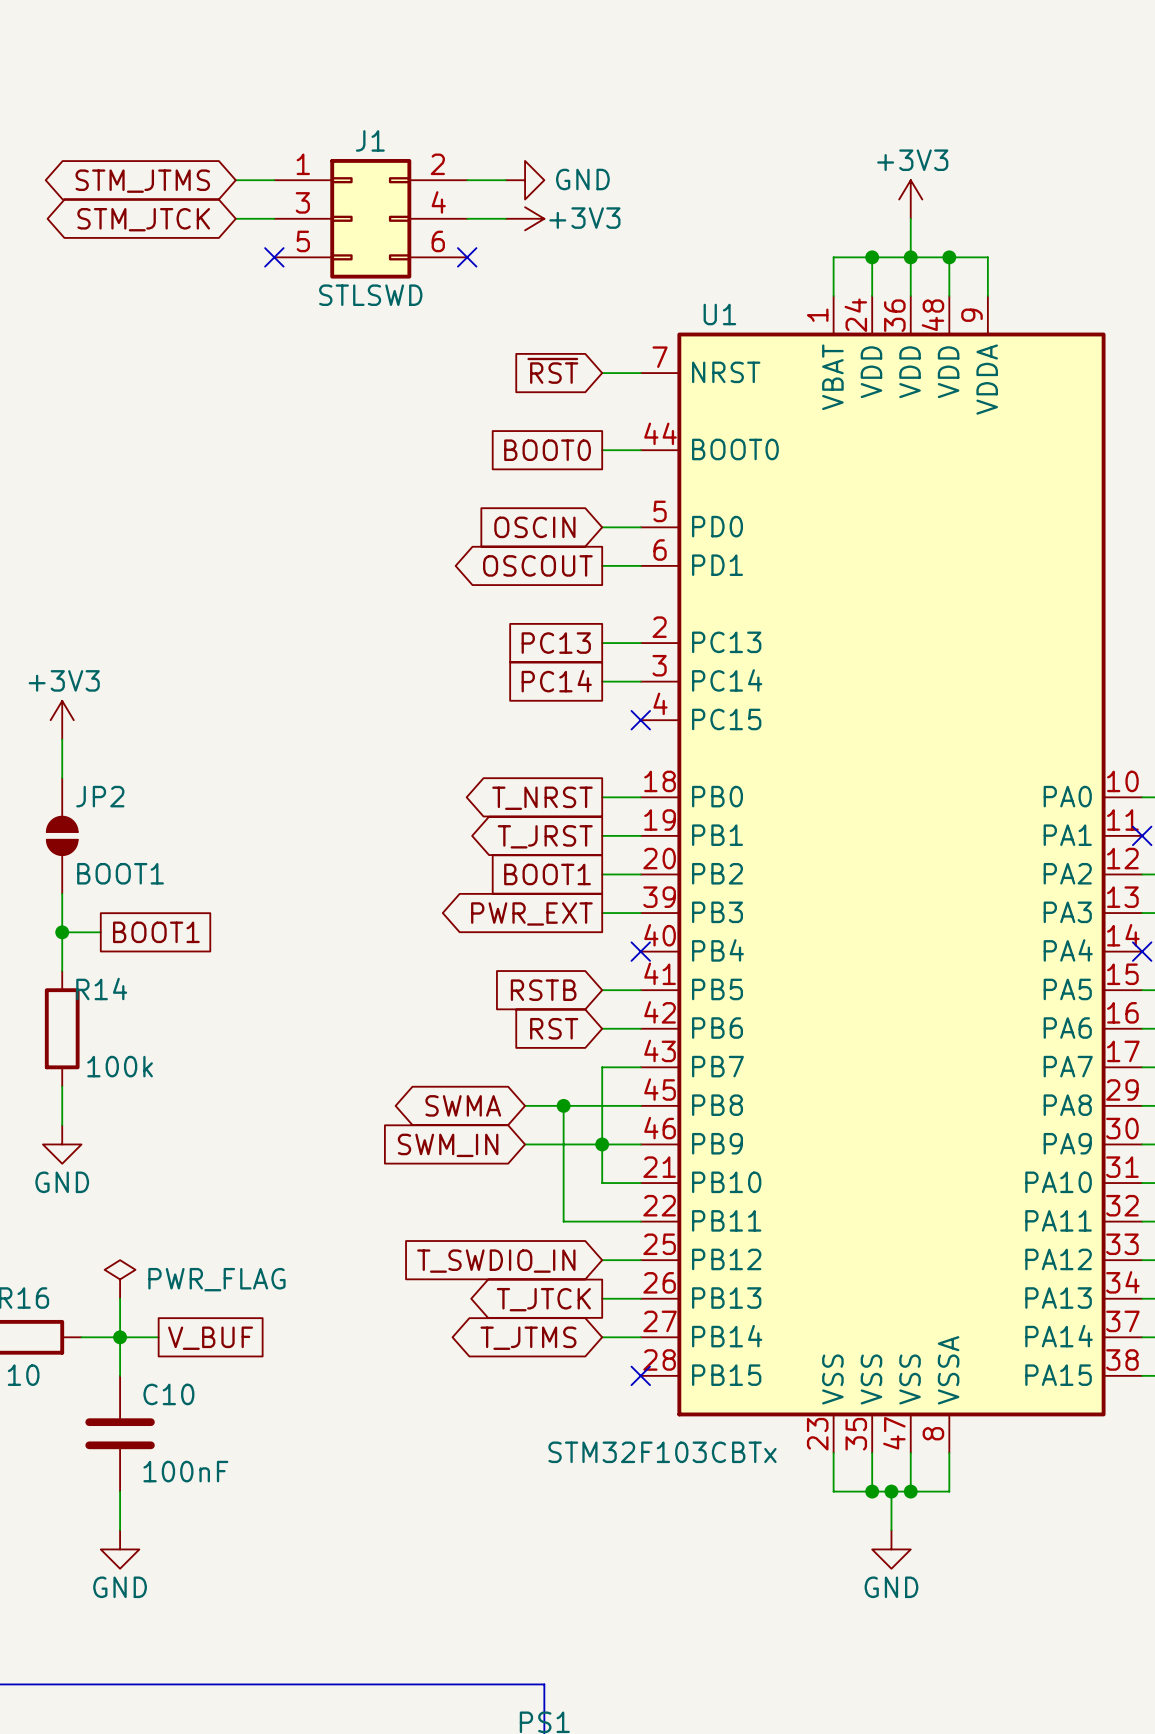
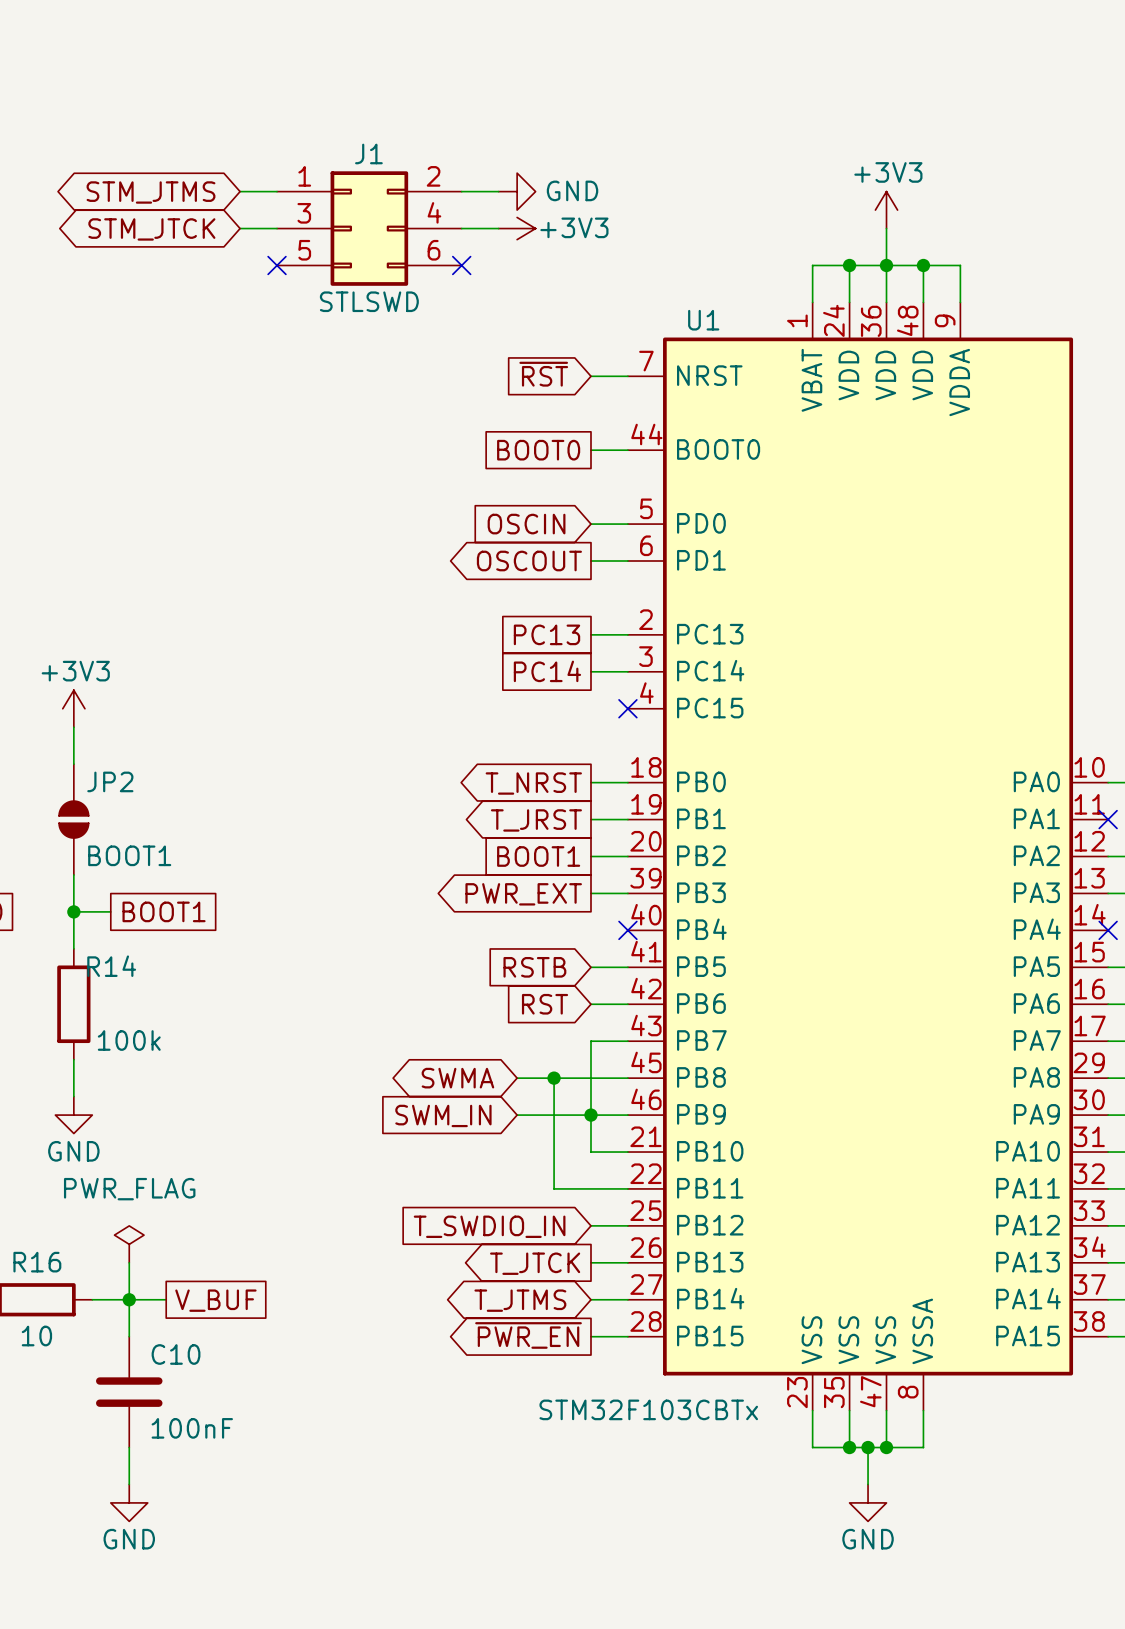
power symbol text position: PWR_FLAG (216, 1279) -> PWR_FLAG (129, 1189)
global label: none -> ~{PWR_EN} (528, 1335)
wire: none -> (590, 1336) (627, 1336)
no-connect mark: (640, 1375) -> none

